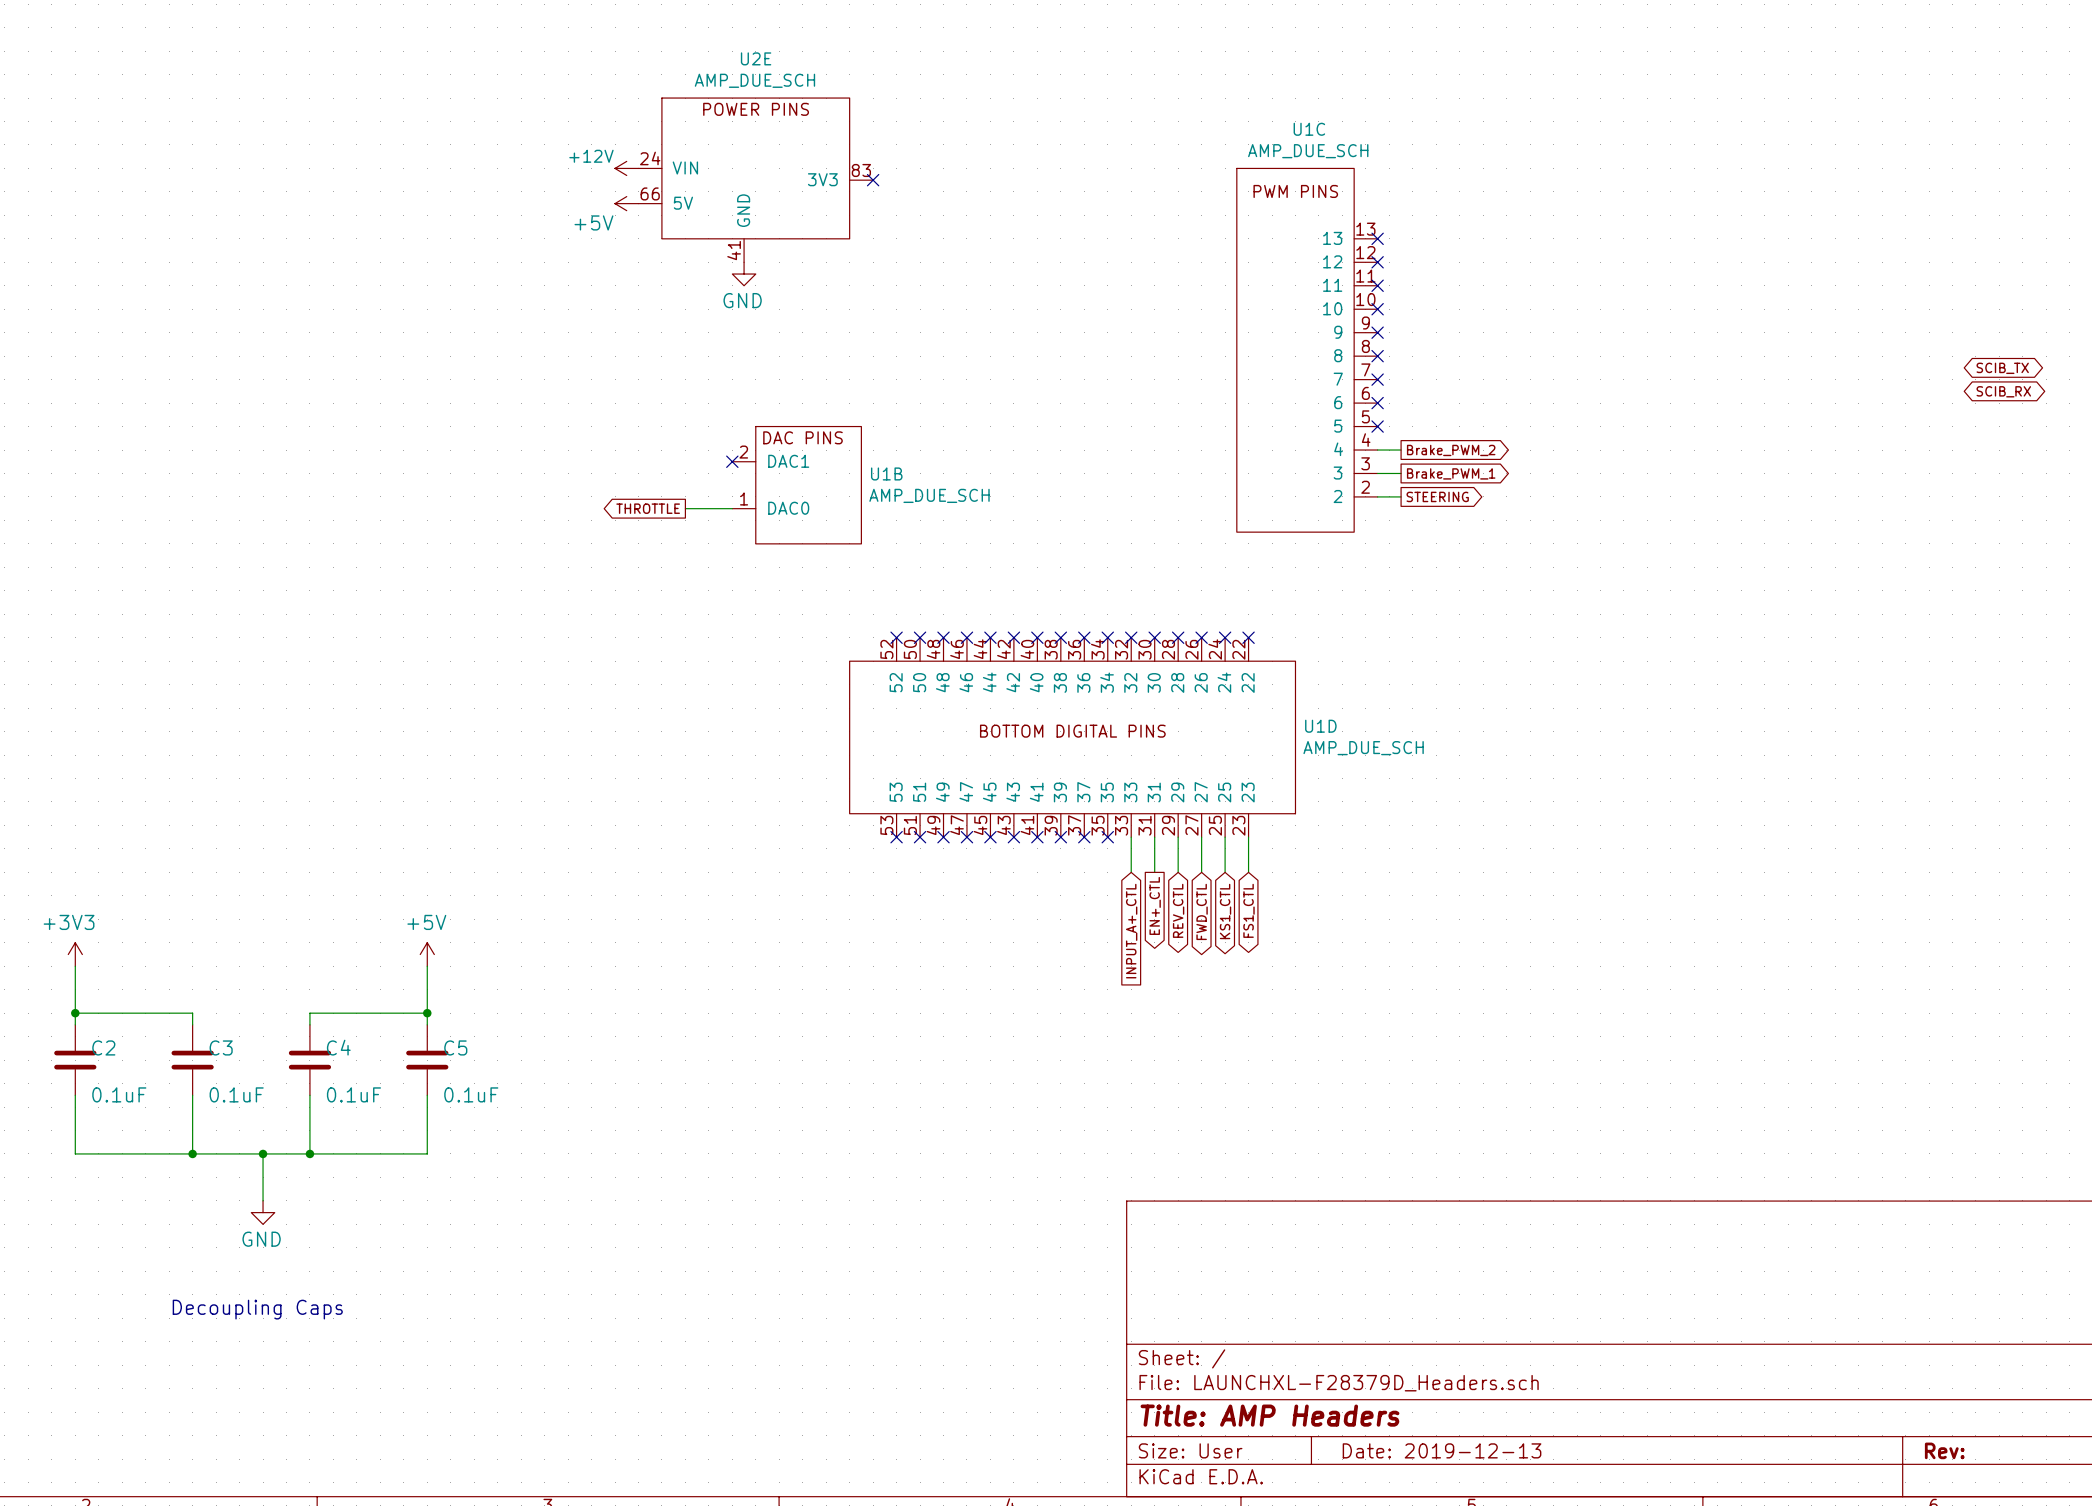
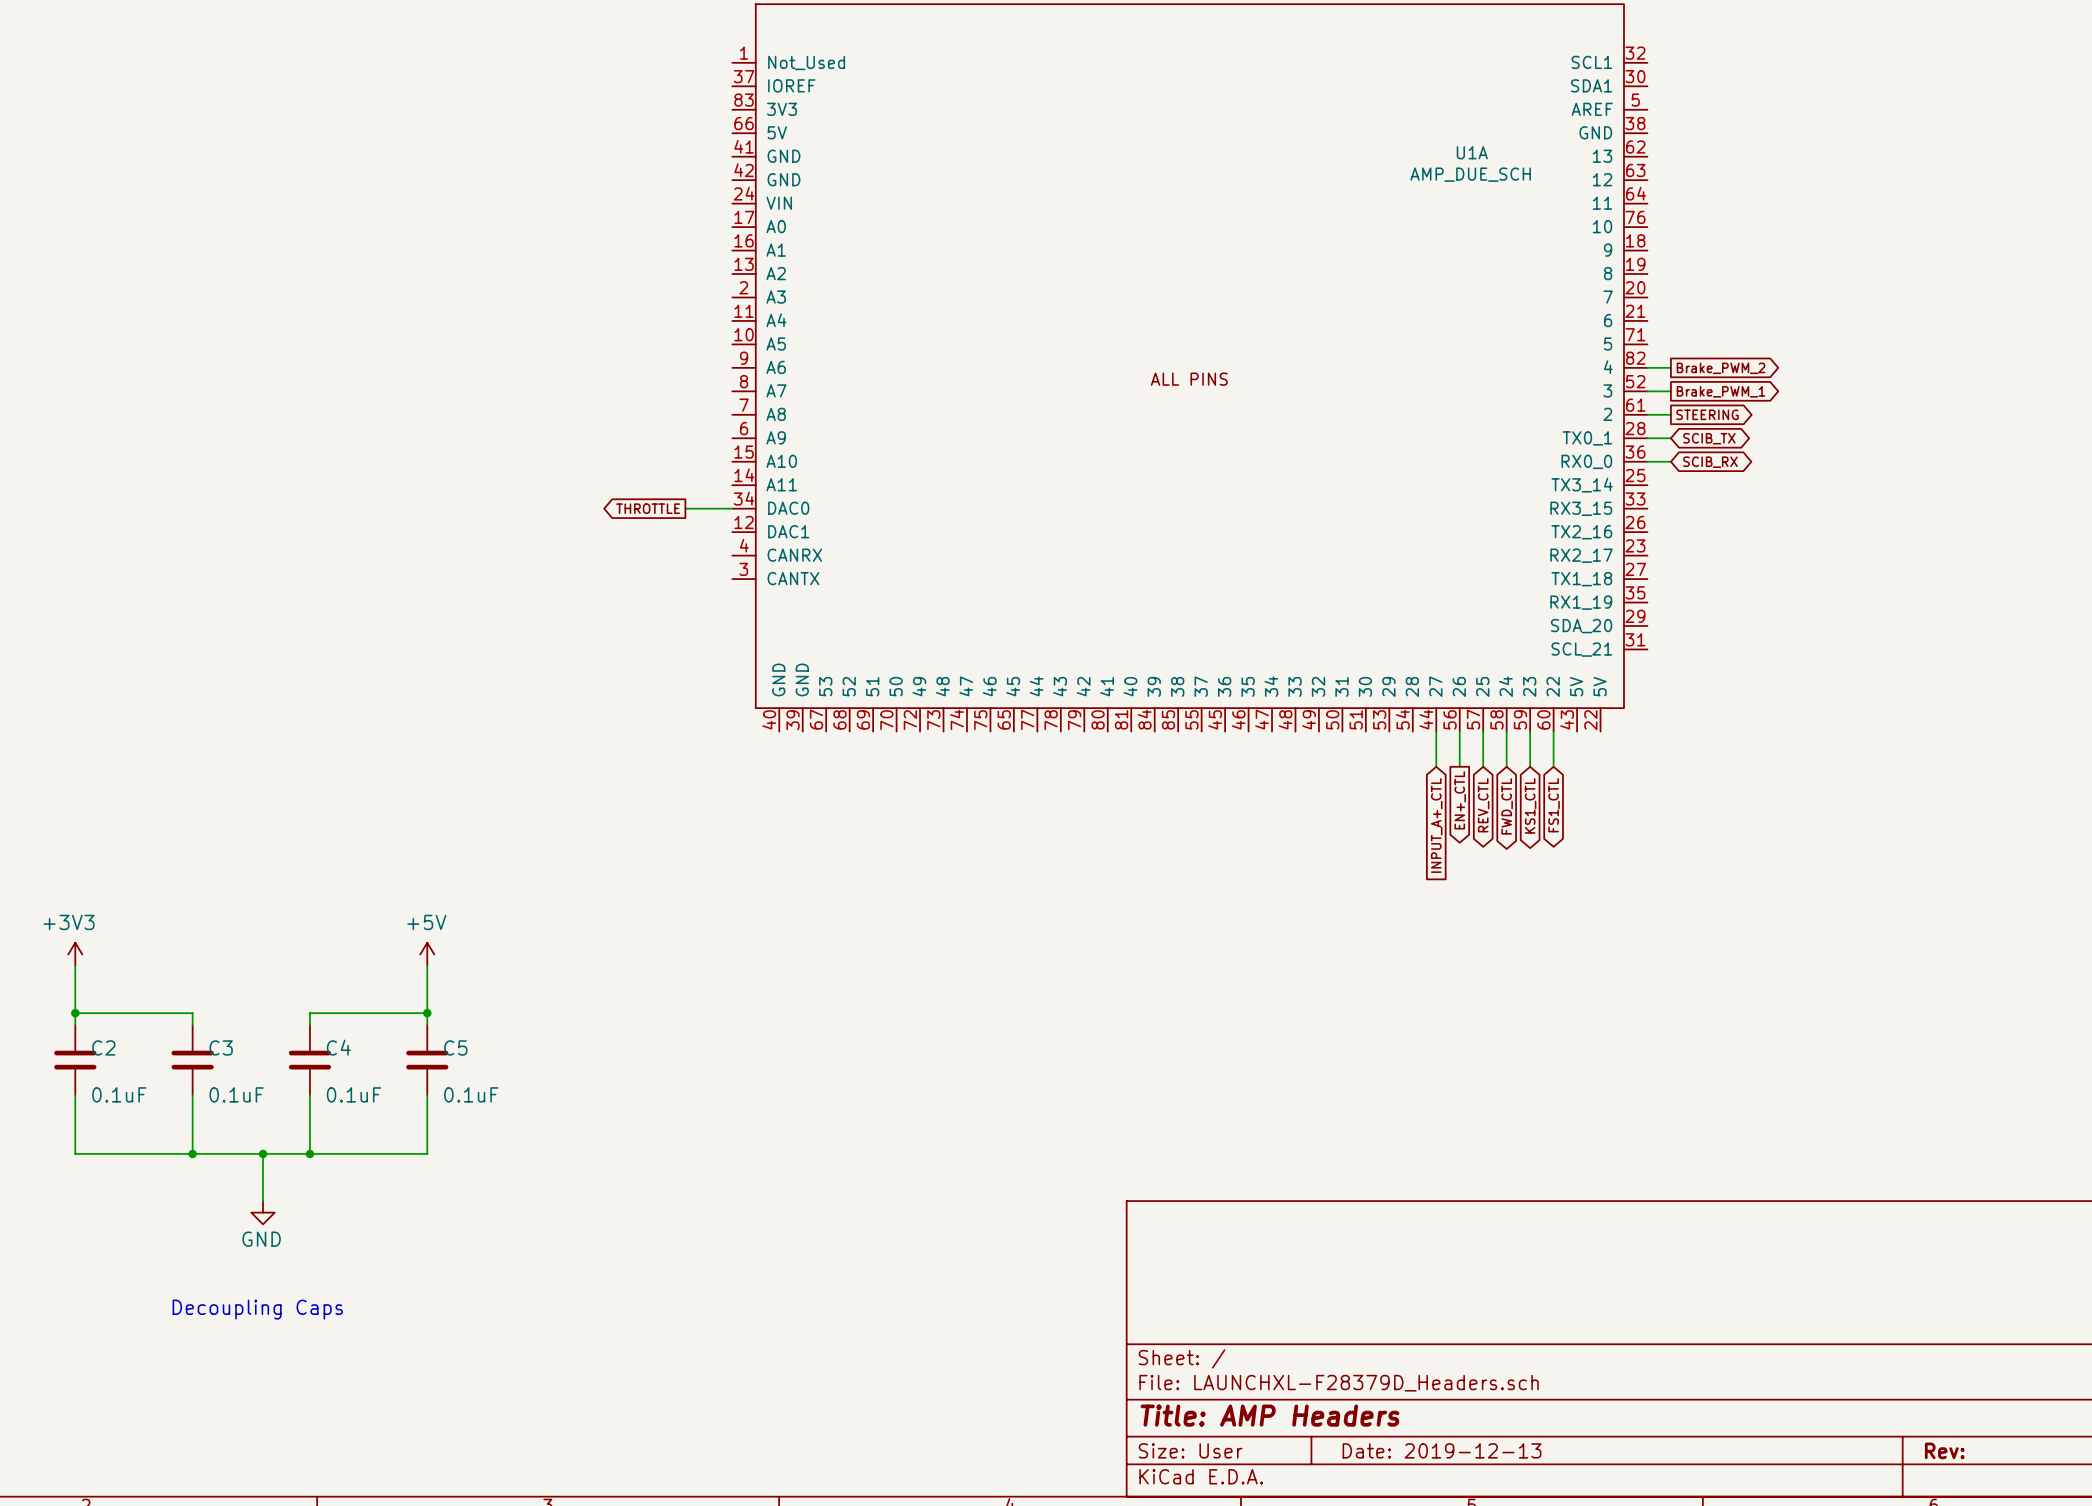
power symbol: +12V (626, 168) -> none
U2E: AMP_DUE_SCH (755, 180) -> none
no-connect mark: (873, 180) -> none
power symbol: +5V (626, 203) -> none
no-connect mark: (1377, 238) -> none
no-connect mark: (1377, 262) -> none
power symbol: GND (744, 274) -> none
no-connect mark: (1377, 285) -> none
no-connect mark: (1377, 309) -> none
no-connect mark: (1377, 332) -> none
U1C: AMP_DUE_SCH (1307, 350) -> none
no-connect mark: (1377, 356) -> none
U1A: none -> AMP_DUE_SCH (1189, 367)
wire: none -> (1647, 367) (1670, 367)
global label: none -> Brake_PWM_2 (1721, 368)
global label: SCIB_TX (2002, 368) -> none
no-connect mark: (1377, 379) -> none
wire: none -> (1647, 391) (1670, 391)
global label: none -> Brake_PWM_1 (1721, 391)
global label: SCIB_RX (2003, 391) -> none
no-connect mark: (1377, 403) -> none
wire: none -> (1647, 414) (1670, 414)
global label: none -> STEERING (1707, 414)
no-connect mark: (1377, 426) -> none
wire: none -> (1647, 438) (1670, 438)
global label: none -> SCIB_TX (1709, 438)
wire: (1377, 450) (1401, 450) -> none
global label: Brake_PWM_2 (1451, 450) -> none
no-connect mark: (732, 461) -> none
wire: none -> (1647, 461) (1670, 461)
global label: none -> SCIB_RX (1710, 462)
wire: (1377, 473) (1401, 473) -> none
global label: Brake_PWM_1 (1451, 473) -> none
U1B: AMP_DUE_SCH (796, 485) -> none
wire: (1377, 496) (1401, 496) -> none
global label: STEERING (1437, 496) -> none
no-connect mark: (896, 637) -> none
no-connect mark: (920, 637) -> none
no-connect mark: (943, 637) -> none
no-connect mark: (966, 637) -> none
no-connect mark: (990, 637) -> none
no-connect mark: (1013, 637) -> none
no-connect mark: (1037, 637) -> none
no-connect mark: (1060, 637) -> none
no-connect mark: (1084, 637) -> none
no-connect mark: (1107, 637) -> none
no-connect mark: (1131, 637) -> none
no-connect mark: (1154, 637) -> none
no-connect mark: (1178, 637) -> none
no-connect mark: (1201, 637) -> none
no-connect mark: (1225, 637) -> none
no-connect mark: (1248, 637) -> none
wire: none -> (1459, 731) (1459, 766)
wire: none -> (1483, 731) (1483, 766)
wire: none -> (1506, 731) (1506, 766)
wire: none -> (1530, 731) (1530, 766)
wire: none -> (1553, 731) (1553, 766)
U1D: AMP_DUE_SCH (1072, 737) -> none
global label: none -> EN+_CTL (1460, 800)
global label: none -> REV_CTL (1483, 805)
global label: none -> KS1_CTL (1530, 805)
global label: none -> FS1_CTL (1554, 805)
global label: none -> FWD_CTL (1507, 806)
global label: none -> INPUT_A+_CTL (1436, 825)
no-connect mark: (896, 837) -> none
no-connect mark: (920, 837) -> none
no-connect mark: (943, 837) -> none
no-connect mark: (966, 837) -> none
no-connect mark: (990, 837) -> none
no-connect mark: (1013, 837) -> none
no-connect mark: (1037, 837) -> none
no-connect mark: (1060, 837) -> none
no-connect mark: (1084, 837) -> none
no-connect mark: (1107, 837) -> none
wire: (1131, 837) (1131, 872) -> none
wire: (1154, 837) (1154, 872) -> none
wire: (1178, 837) (1178, 872) -> none
wire: (1201, 837) (1201, 872) -> none
wire: (1225, 837) (1225, 872) -> none
wire: (1248, 837) (1248, 872) -> (1436, 731) (1436, 766)
global label: EN+_CTL (1155, 905) -> none
global label: REV_CTL (1178, 910) -> none
global label: FS1_CTL (1248, 910) -> none
global label: FWD_CTL (1202, 911) -> none
global label: KS1_CTL (1225, 911) -> none
global label: INPUT_A+_CTL (1131, 931) -> none

